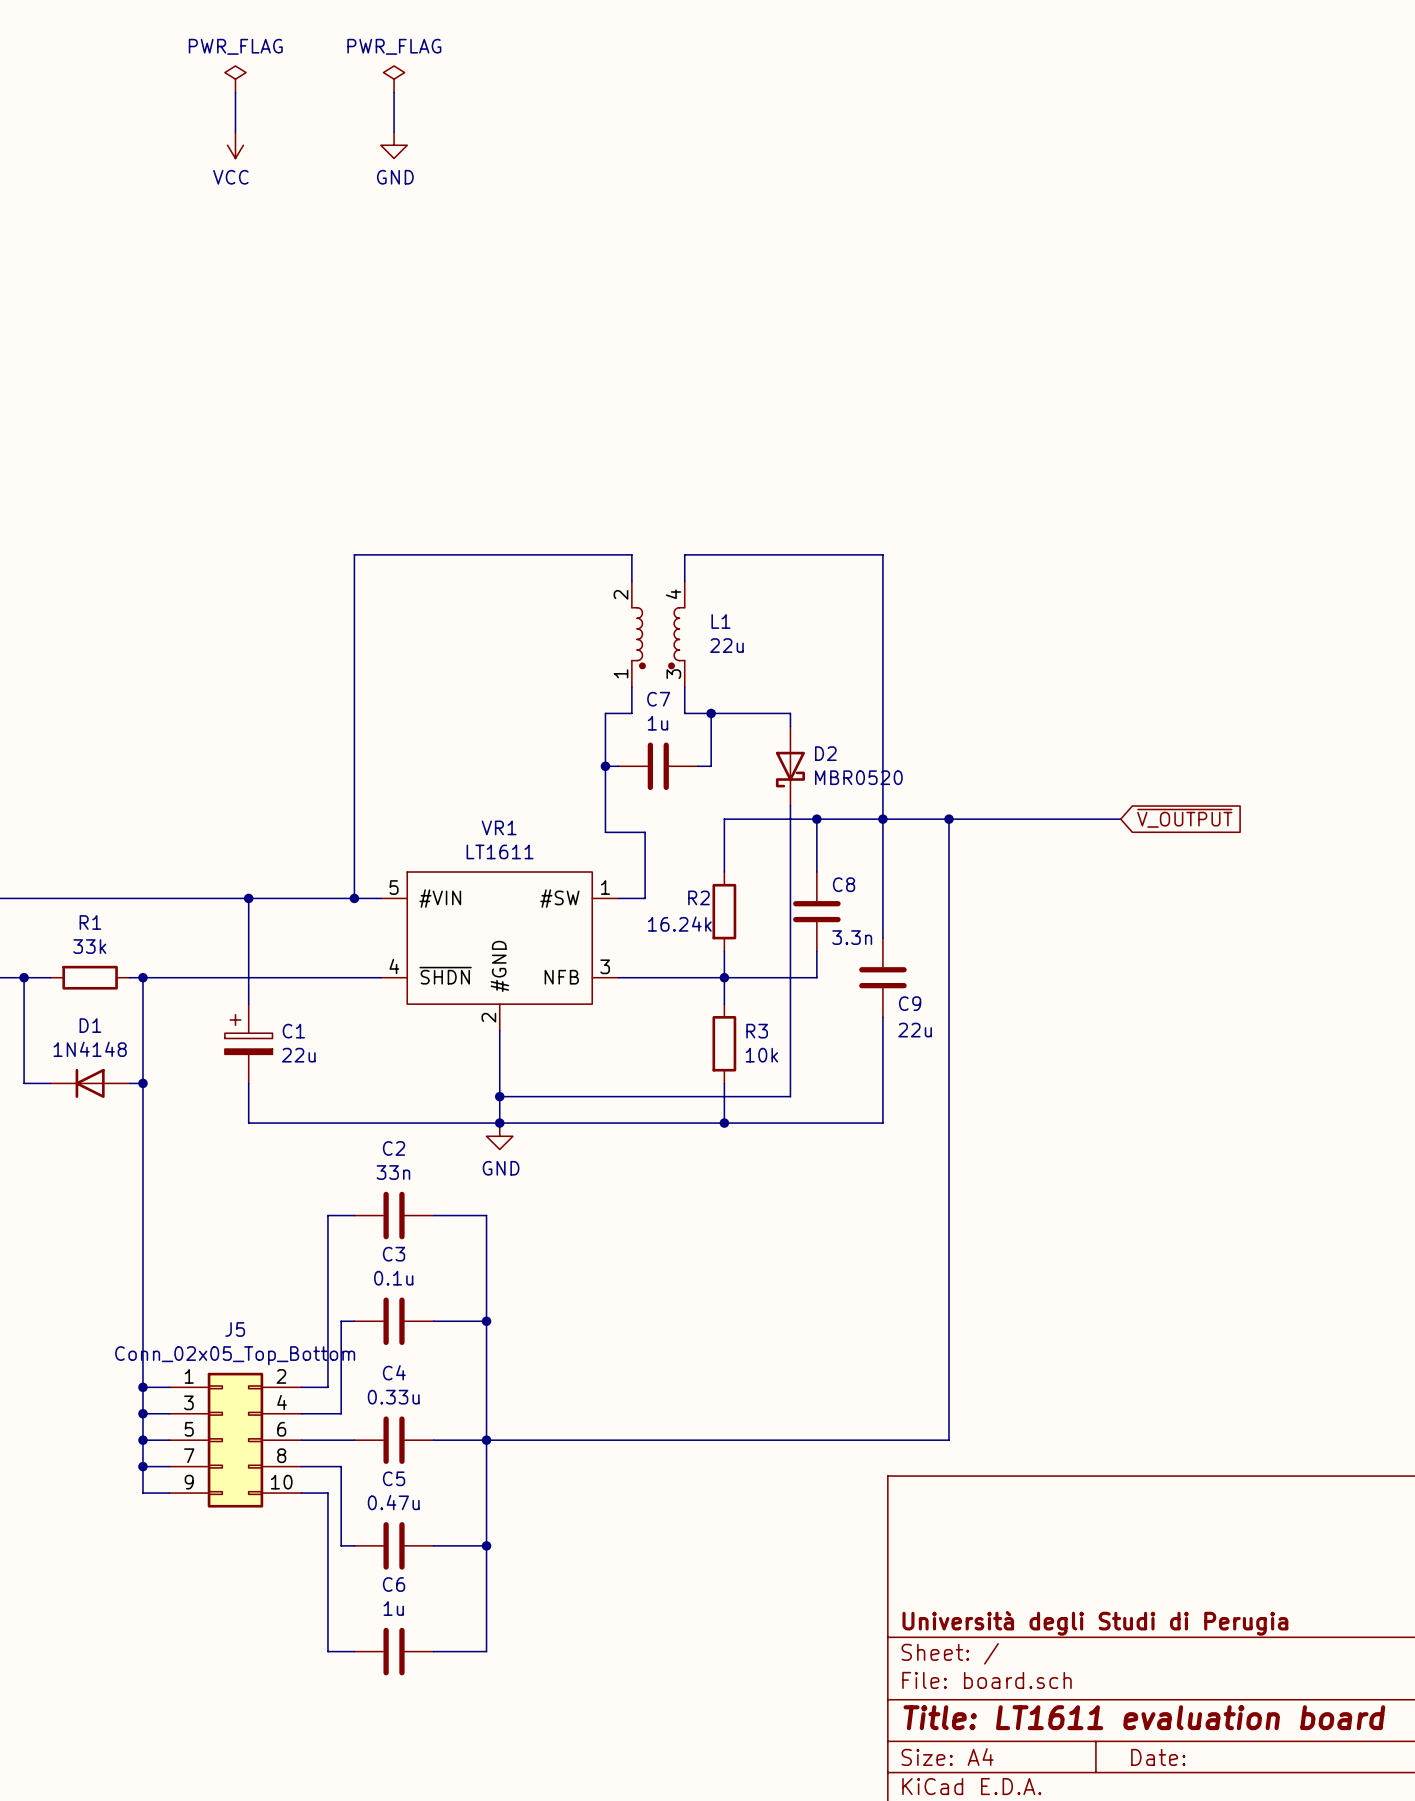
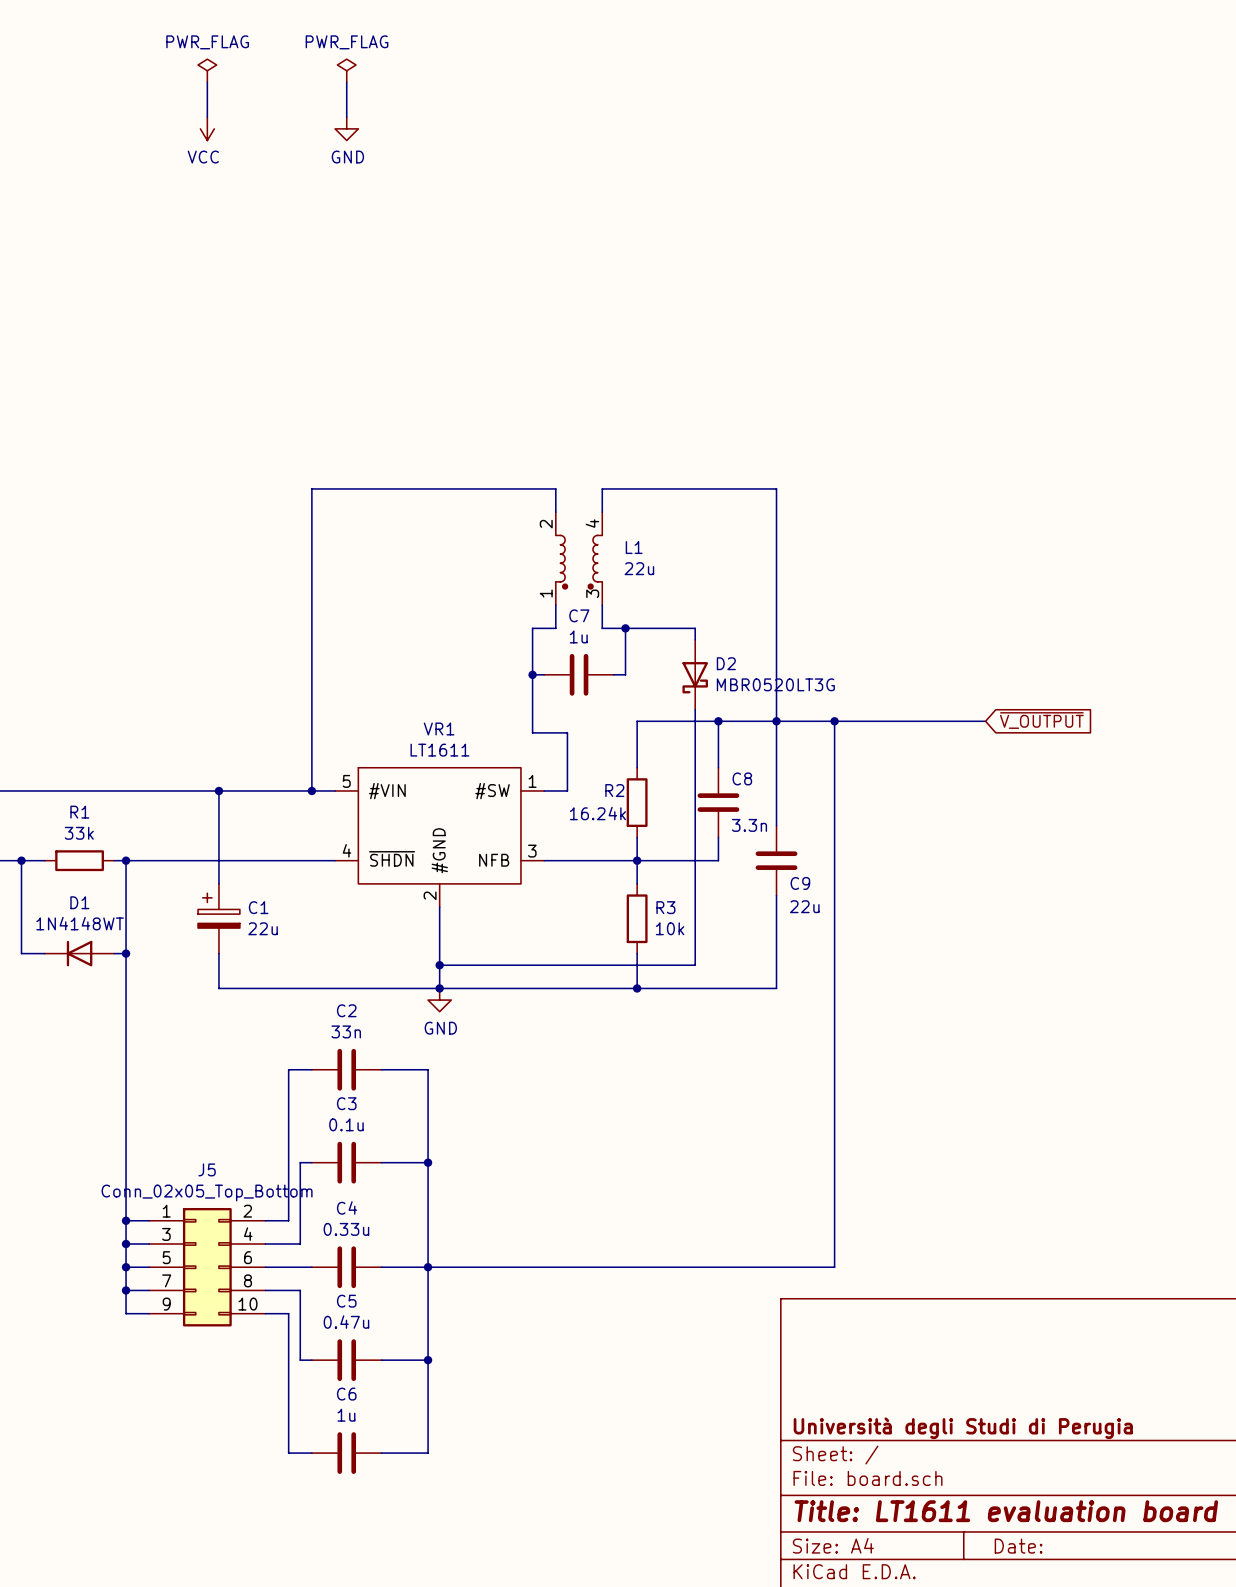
D2 value: MBR0520 (858, 777) -> MBR0520LT3G (775, 684)
D1 value: 1N4148 (90, 1049) -> 1N4148WT (80, 923)

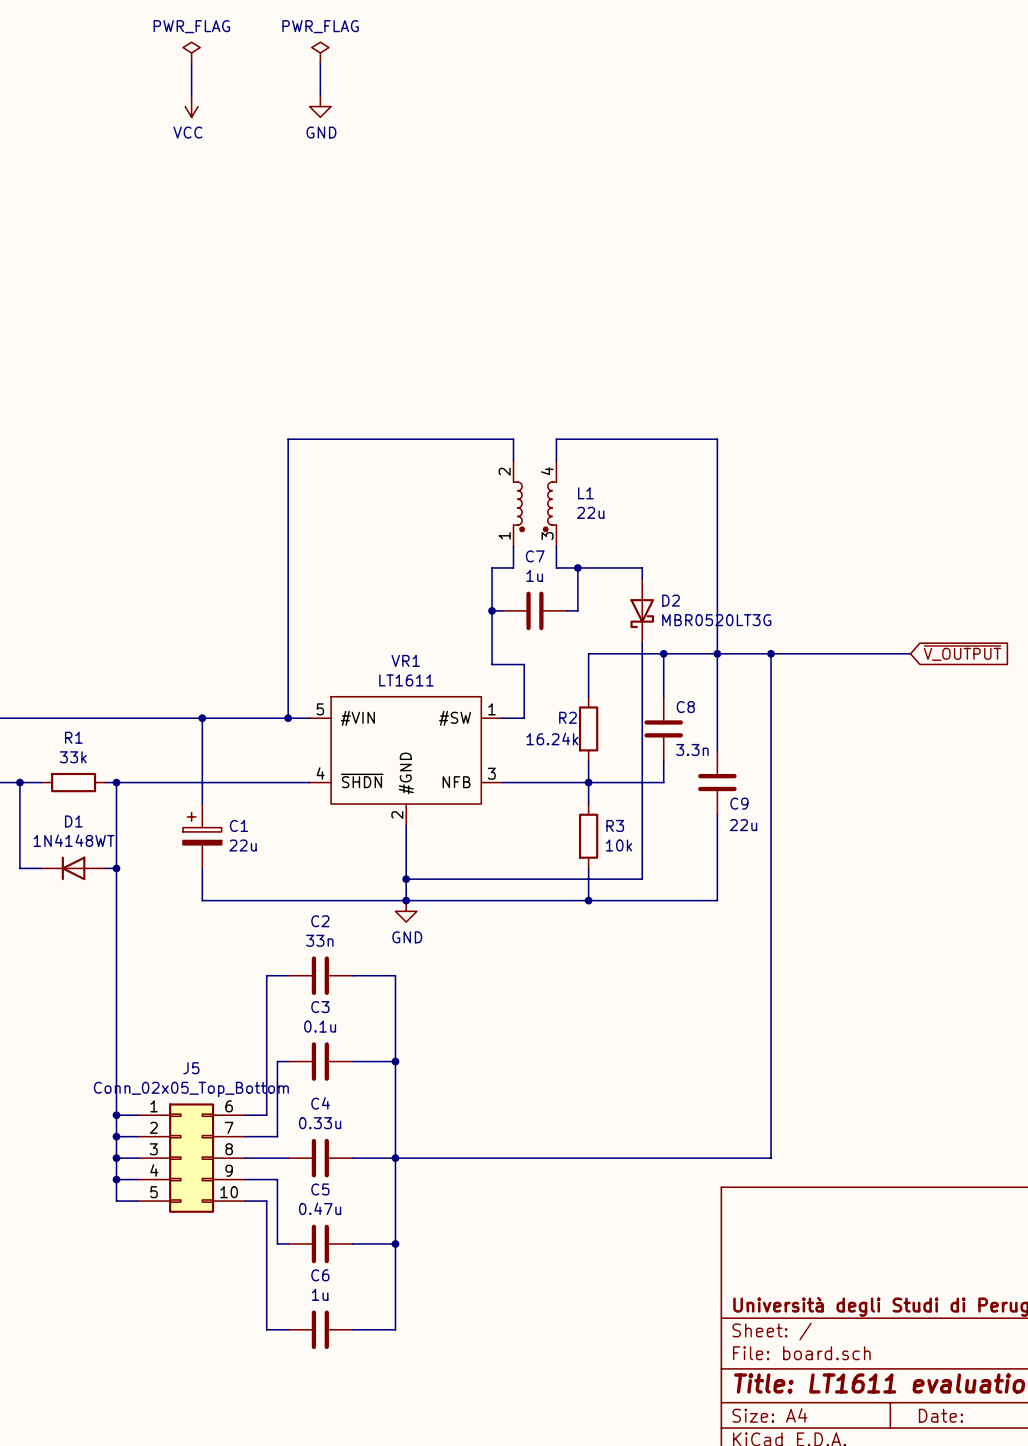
J5 pin number: 2 (247, 1211) -> 6 (229, 1106)
J5 pin number: 3 (166, 1234) -> 2 (153, 1127)
J5 pin number: 4 (248, 1234) -> 7 (229, 1127)
J5 pin number: 5 (166, 1257) -> 3 (153, 1149)
J5 pin number: 6 (248, 1257) -> 8 (229, 1149)
J5 pin number: 7 (166, 1280) -> 4 (154, 1170)
J5 pin number: 8 (248, 1280) -> 9 (229, 1170)
J5 pin number: 9 (166, 1304) -> 5 (154, 1192)

